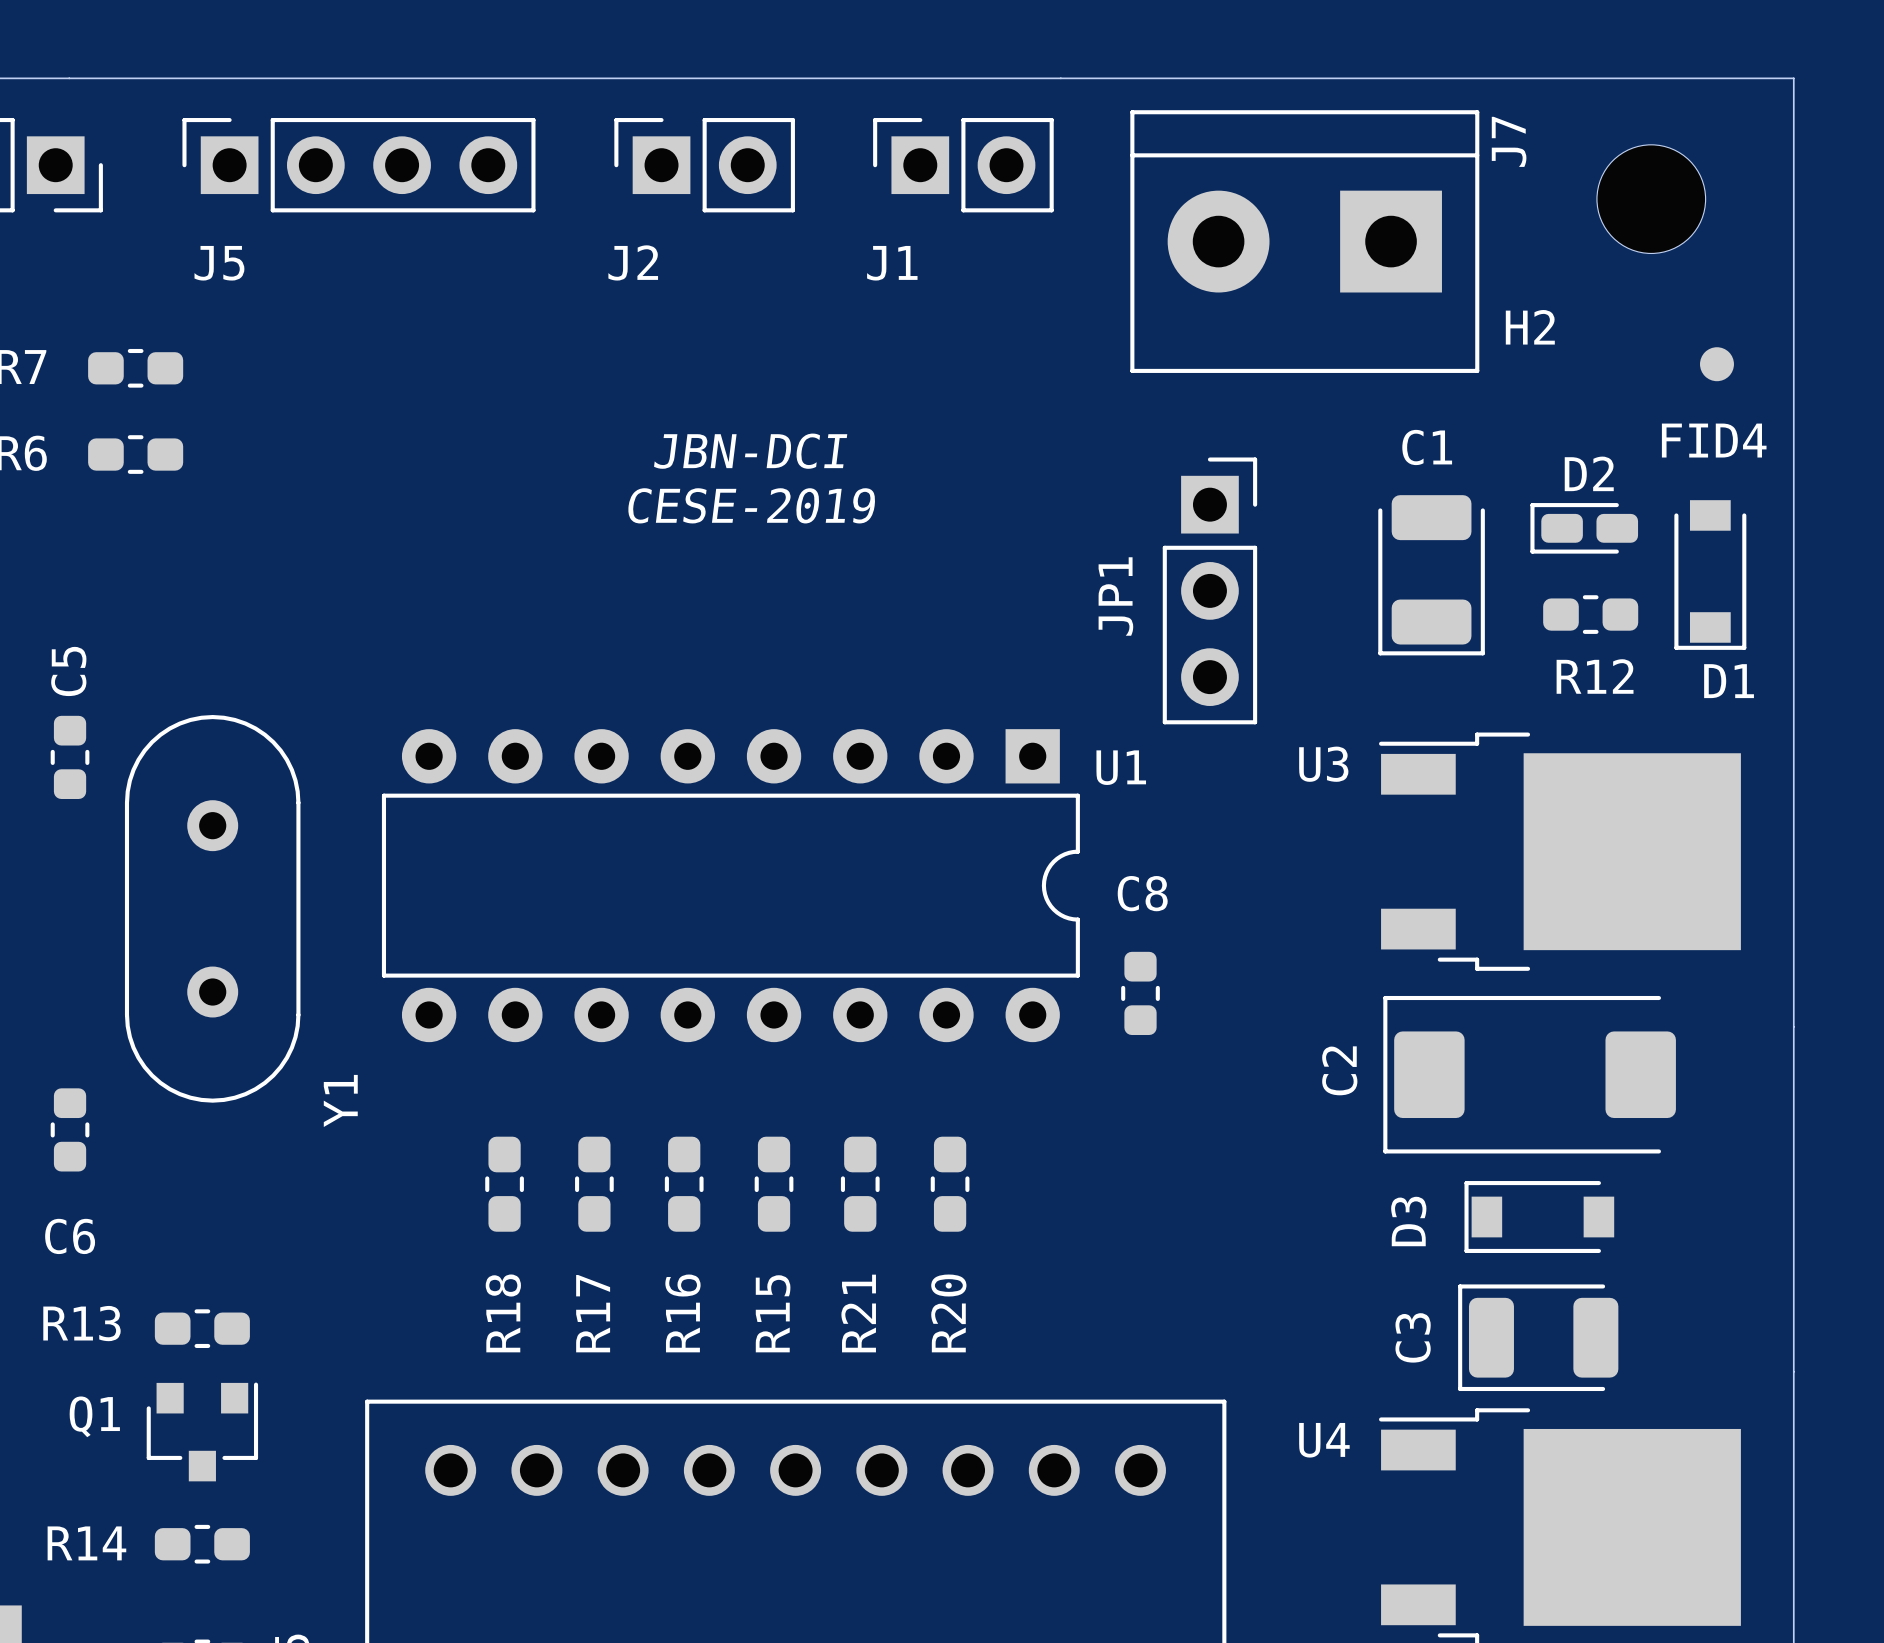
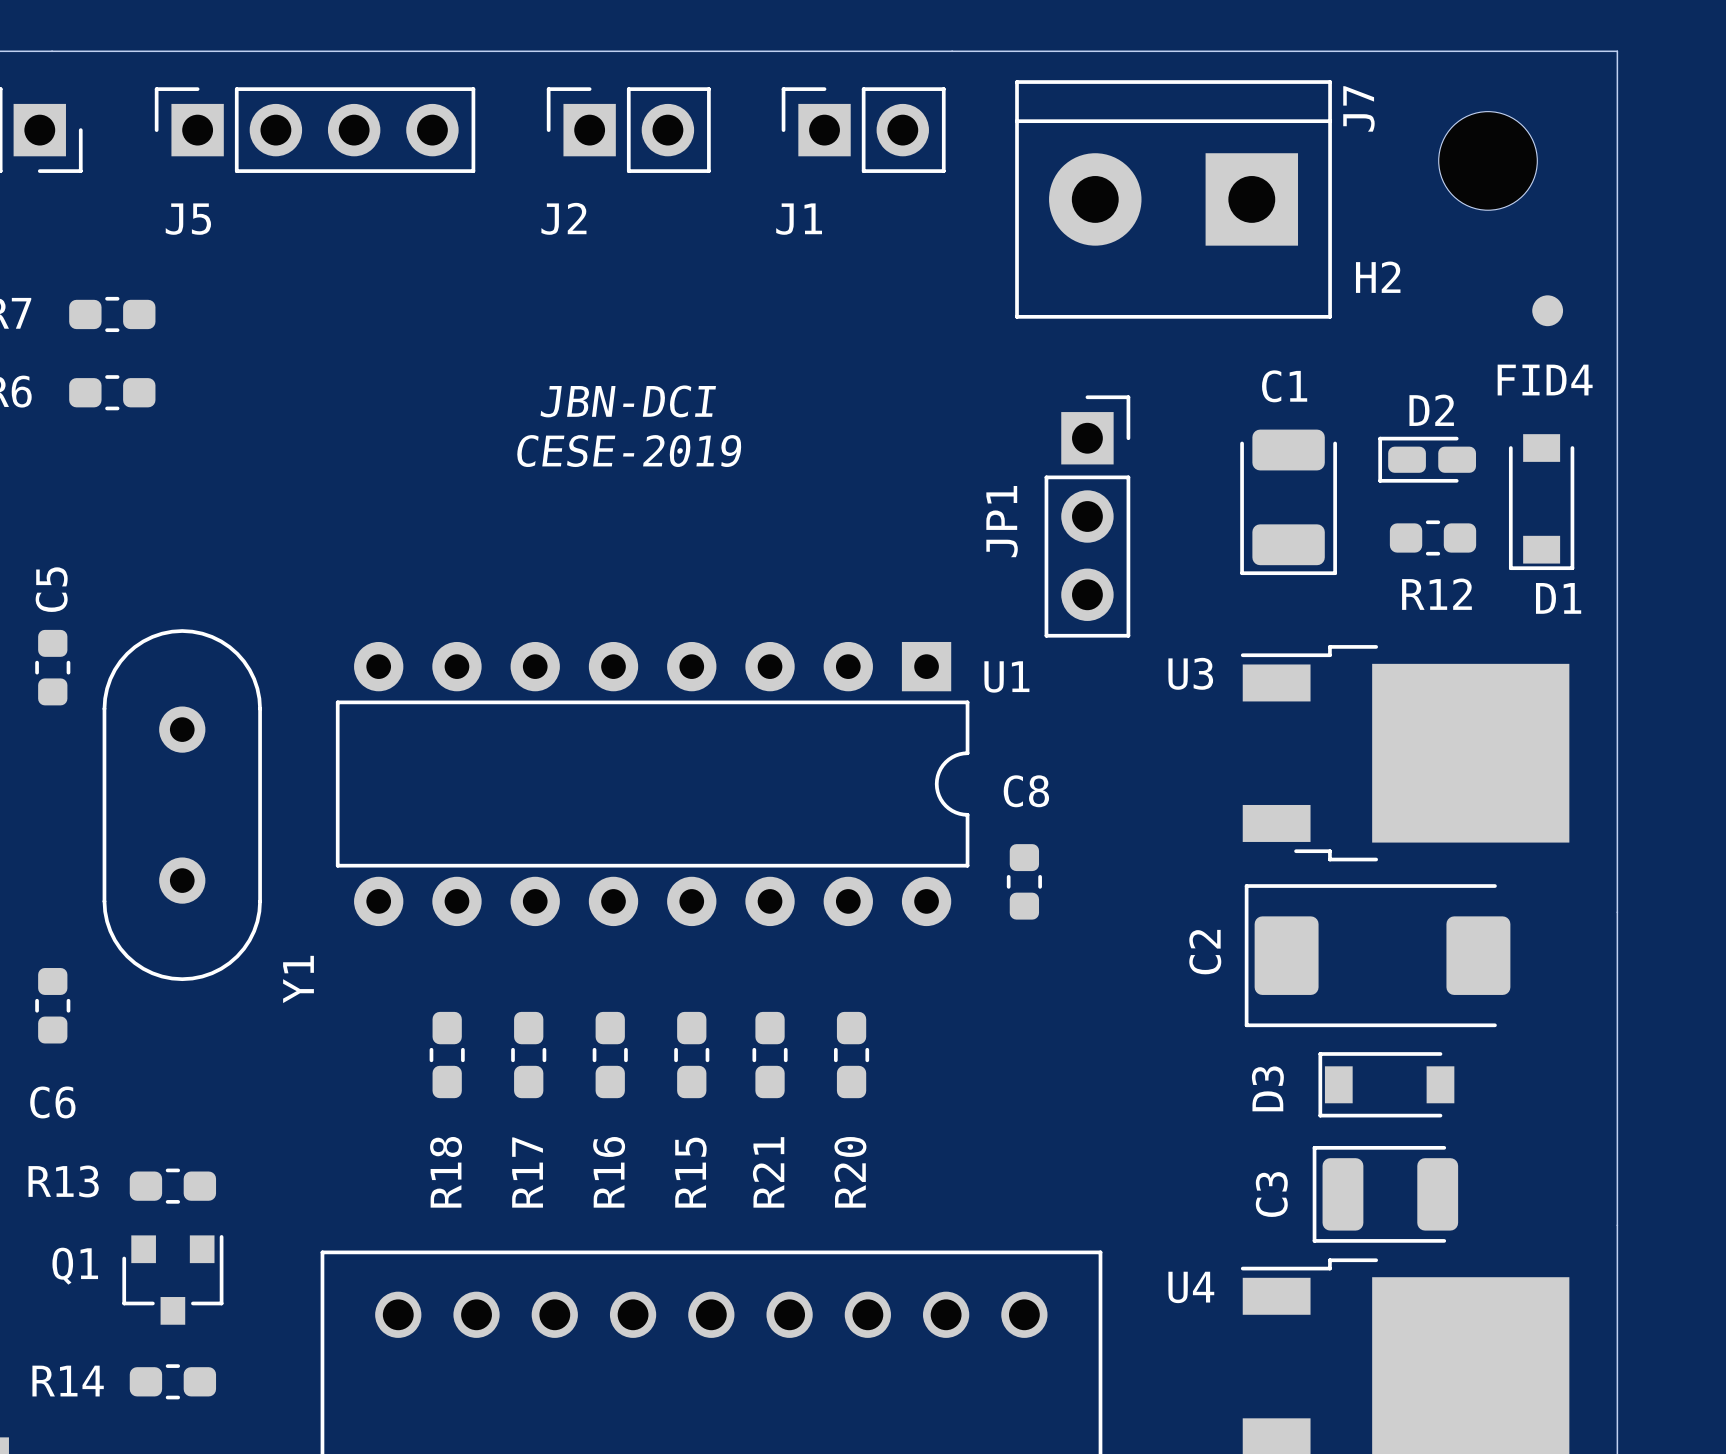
text position: JBN-DCI (750, 451) -> JBN-DCI (628, 401)
text position: CESE-2019 (751, 505) -> CESE-2019 (629, 451)

